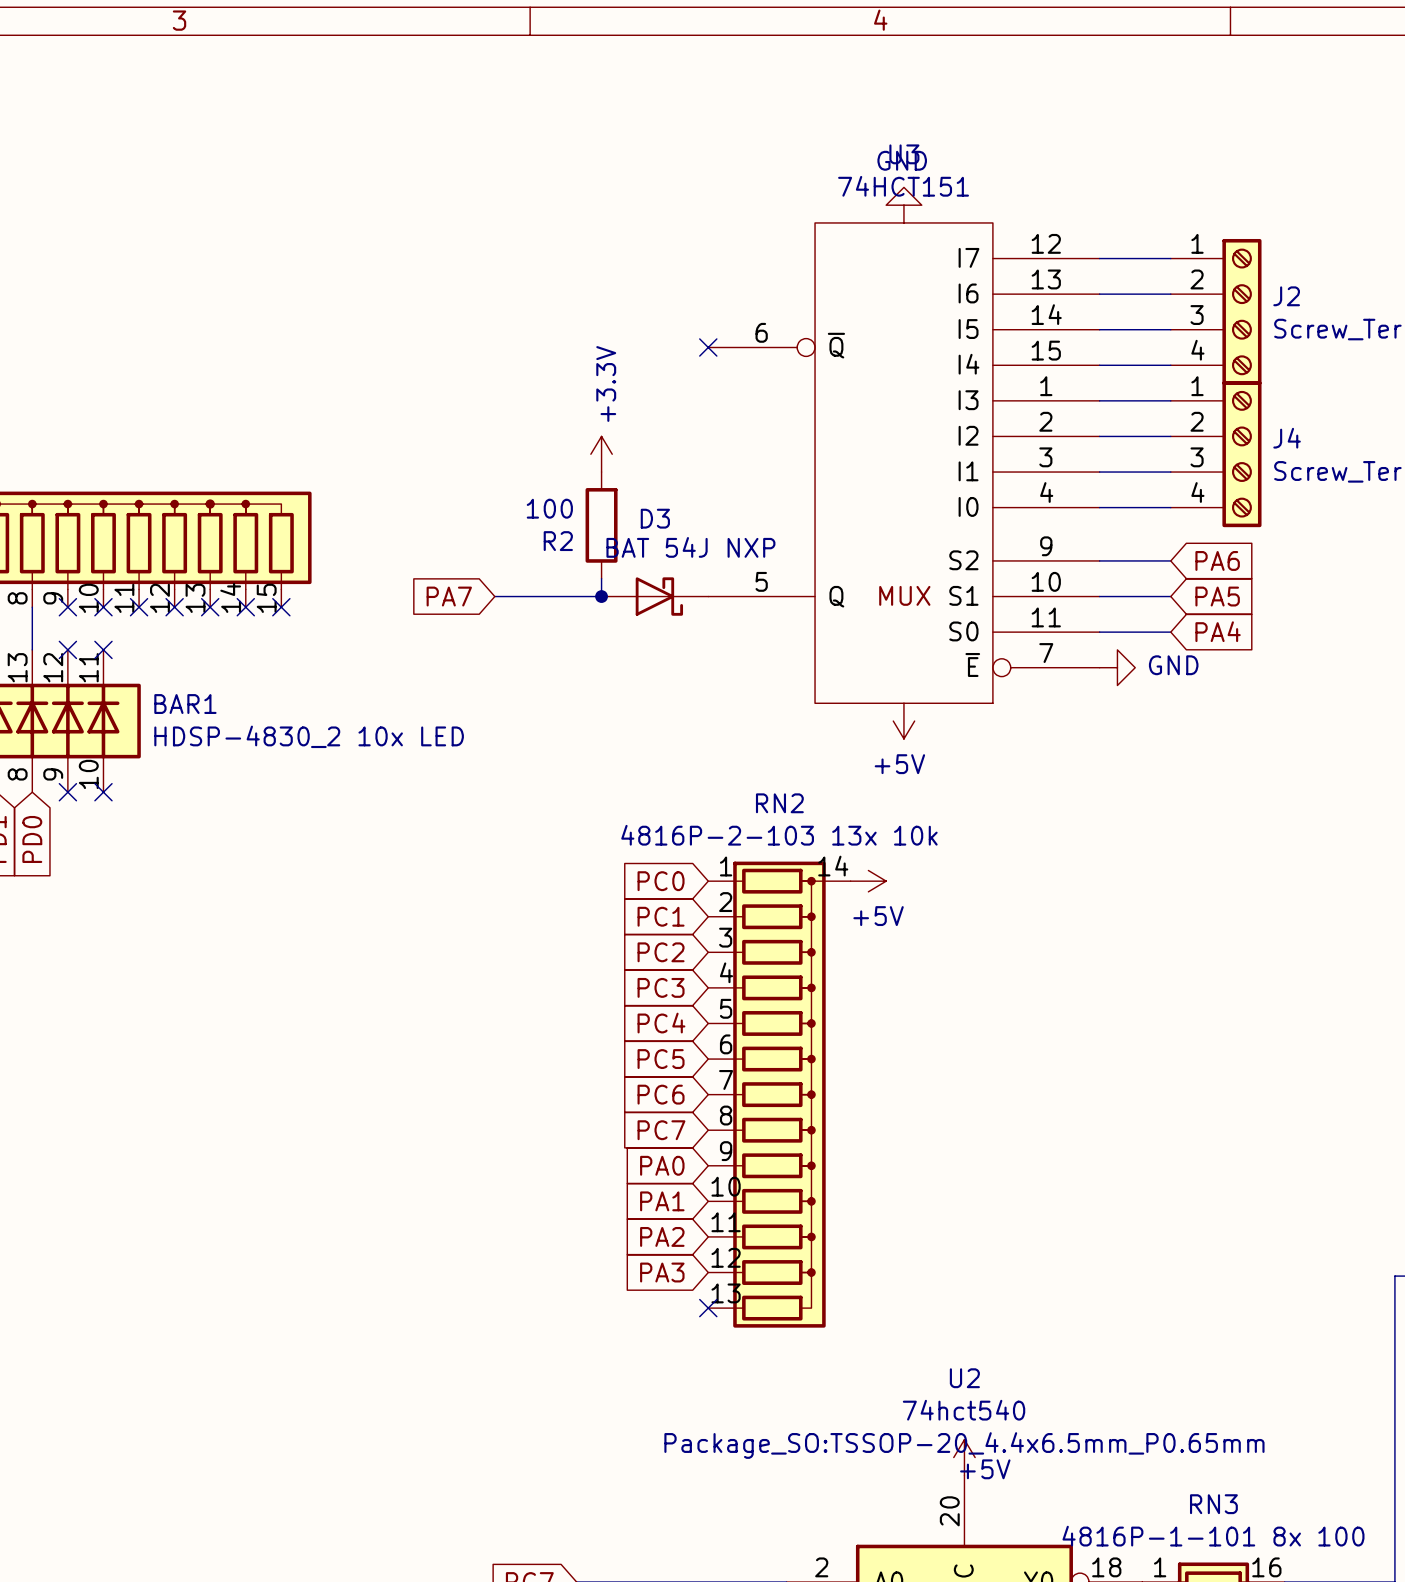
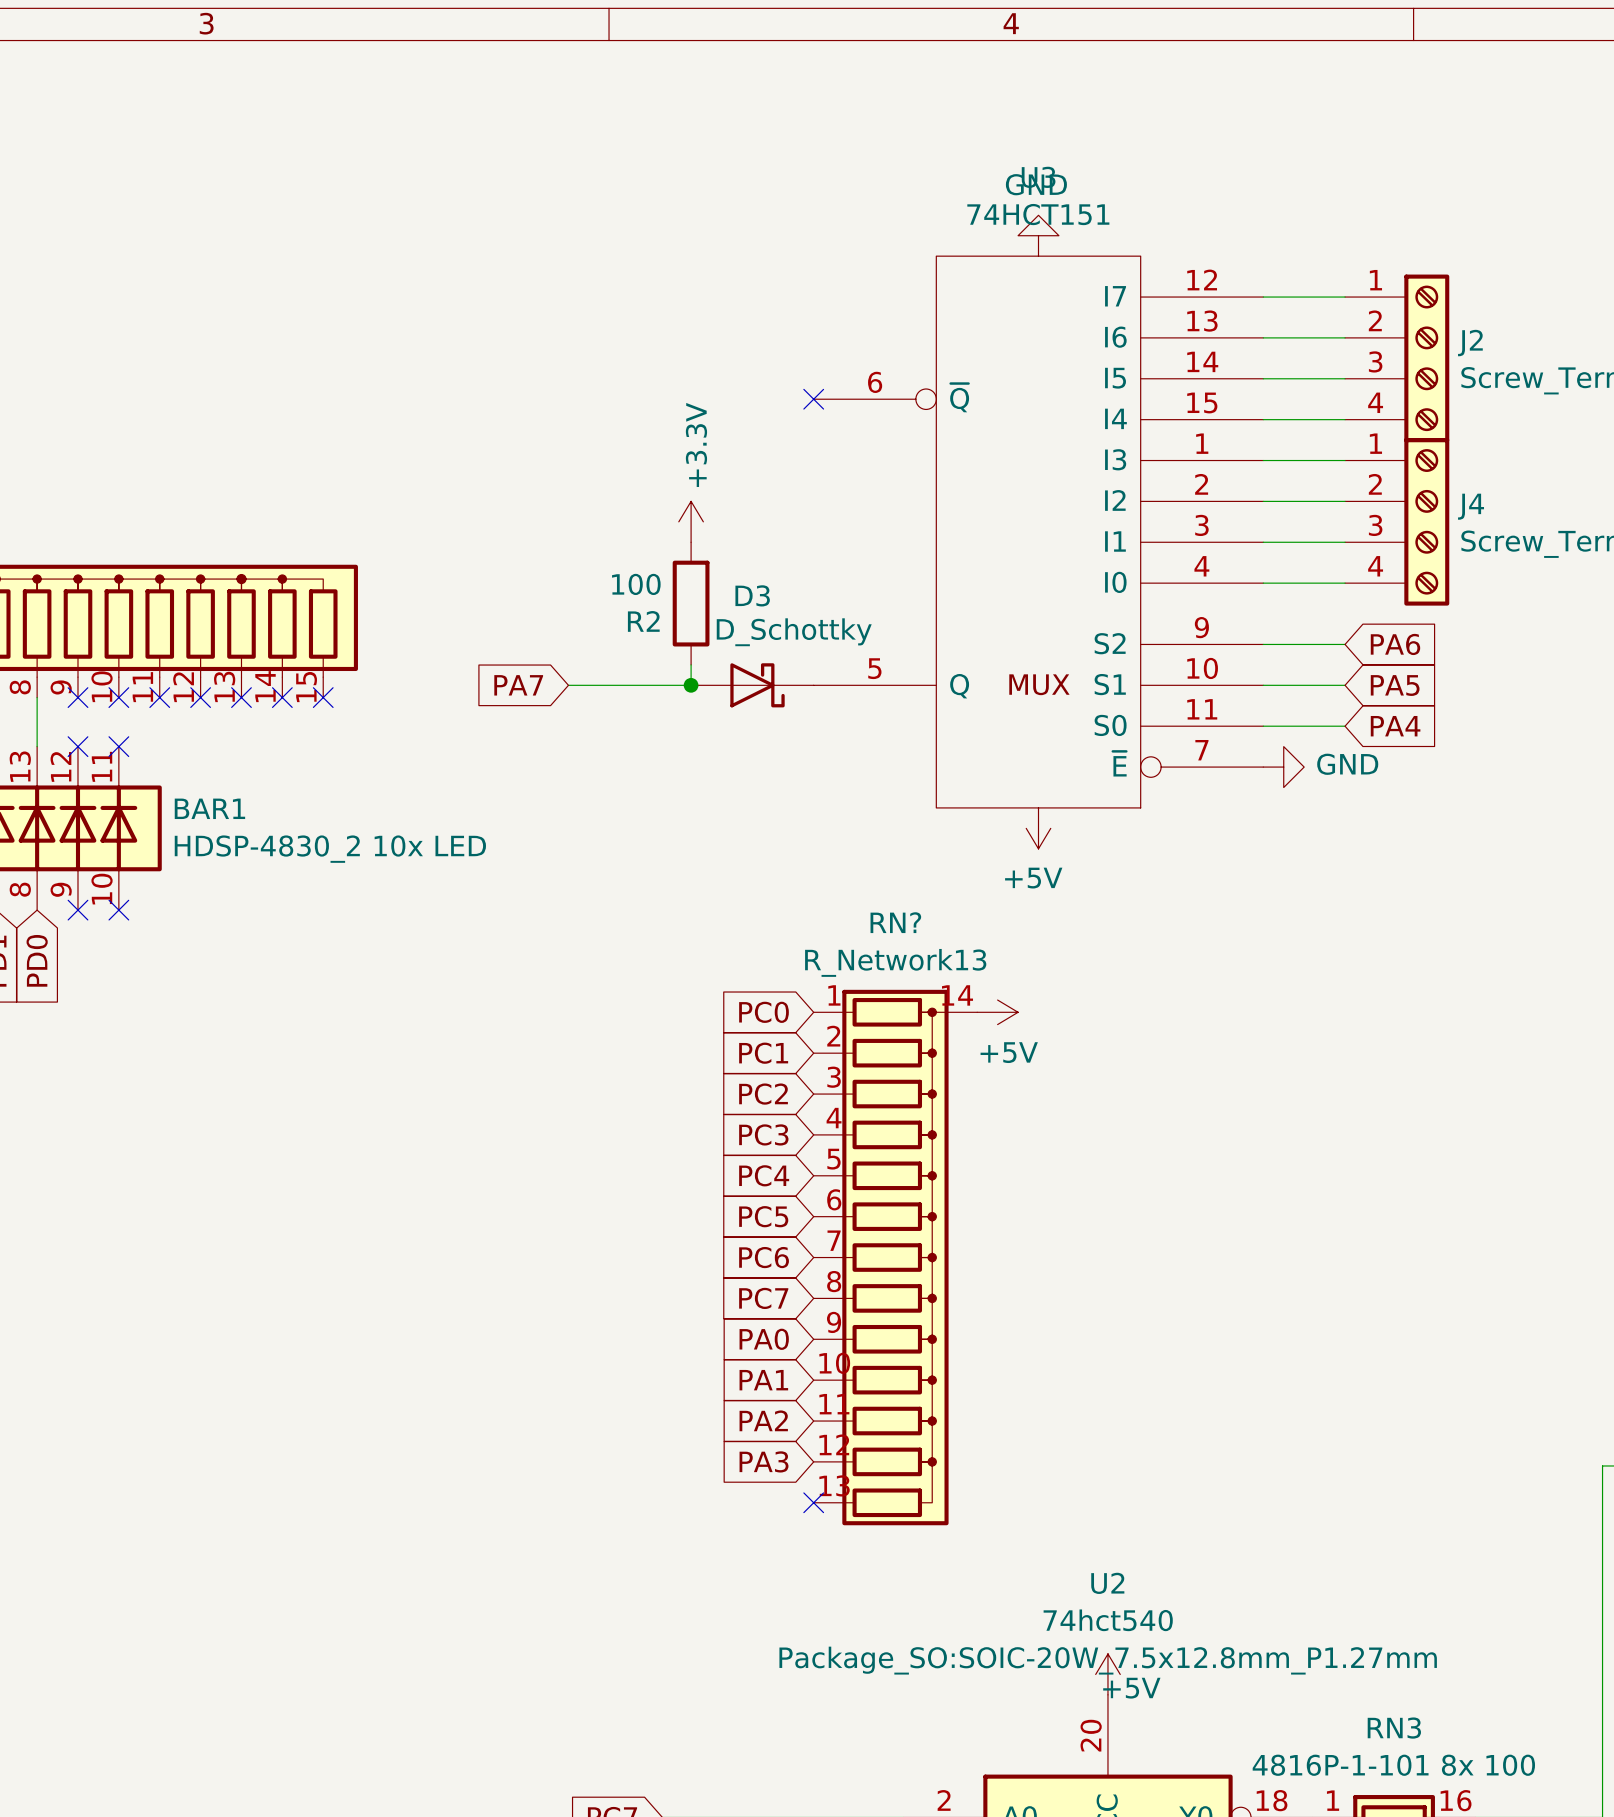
D3 value: BAT 54J NXP (690, 547) -> D_Schottky (794, 632)
RN2 name: RN2 (779, 803) -> RN? (895, 922)
RN2 value: 4816P-2-103 13x 10k (779, 835) -> R_Network13 (895, 962)
U2 text: Package_SO:TSSOP-20_4.4x6.5mm_P0.65mm (964, 1445) -> Package_SO:SOIC-20W_7.5x12.8mm_P1.27mm (1108, 1660)

